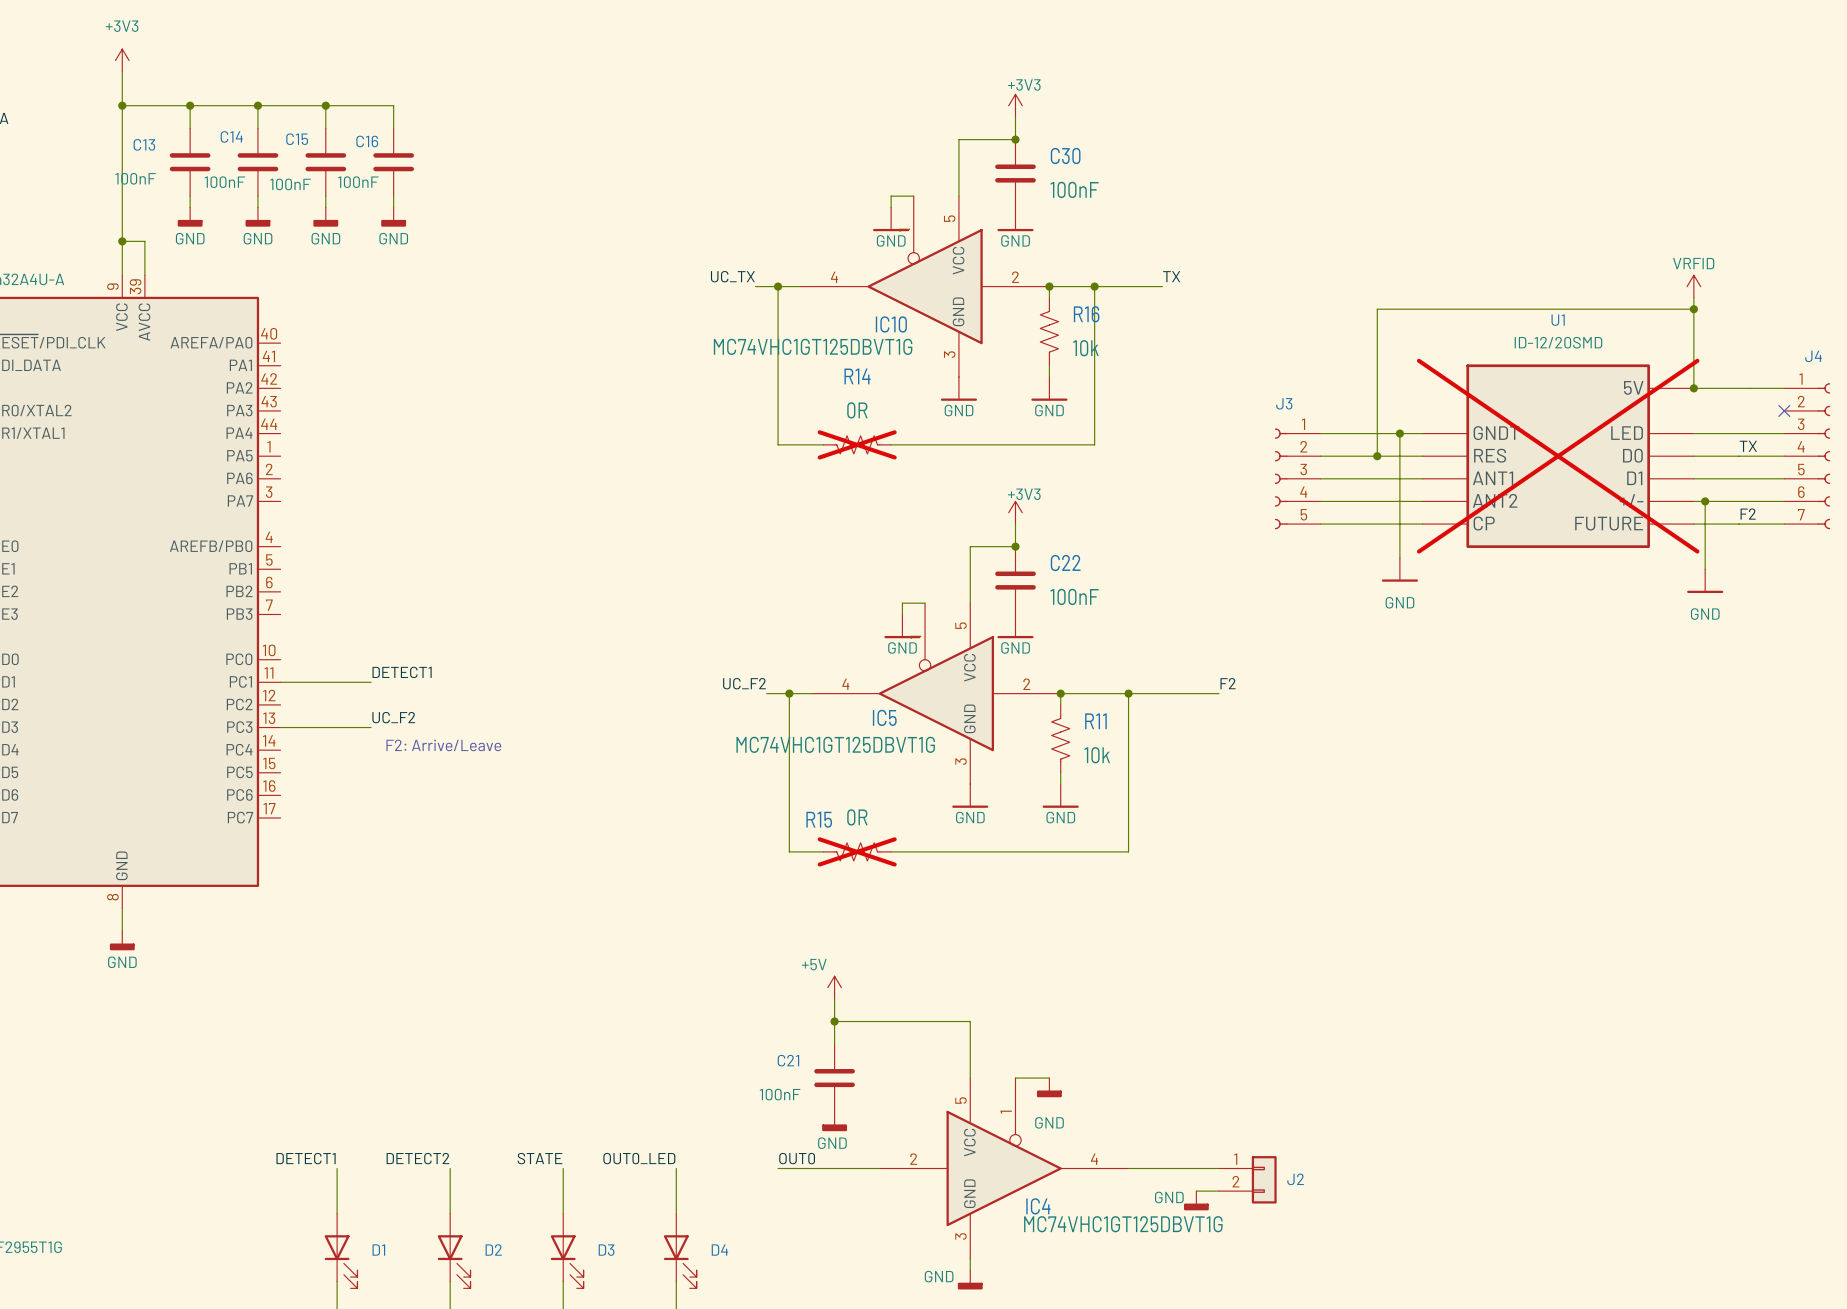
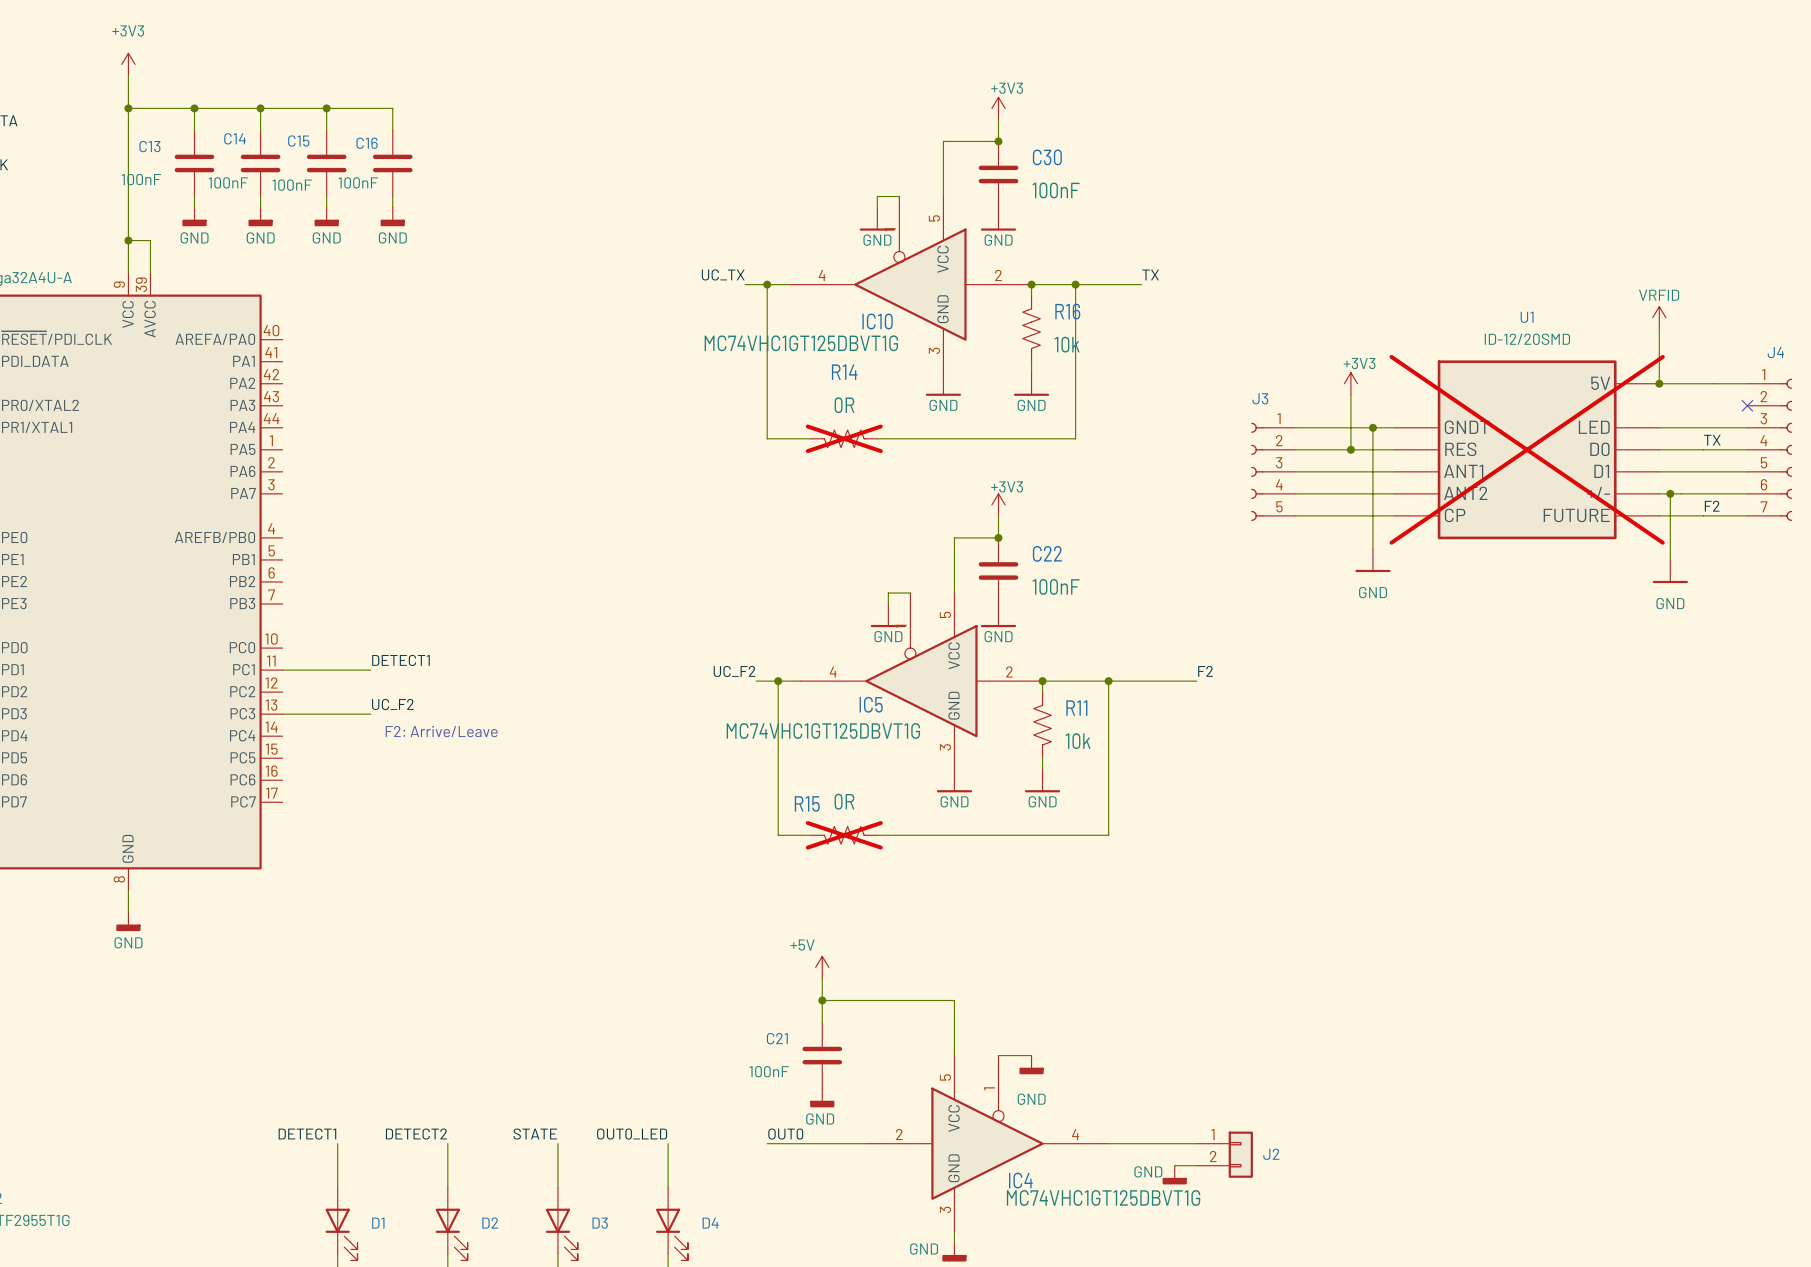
power symbol position: VRFID (1693, 286) -> VRFID (1659, 317)
wire: (1693, 309) (1377, 309) (1377, 399) -> none
junction: (1693, 309) -> none
power symbol: none -> +3V3 (1350, 383)

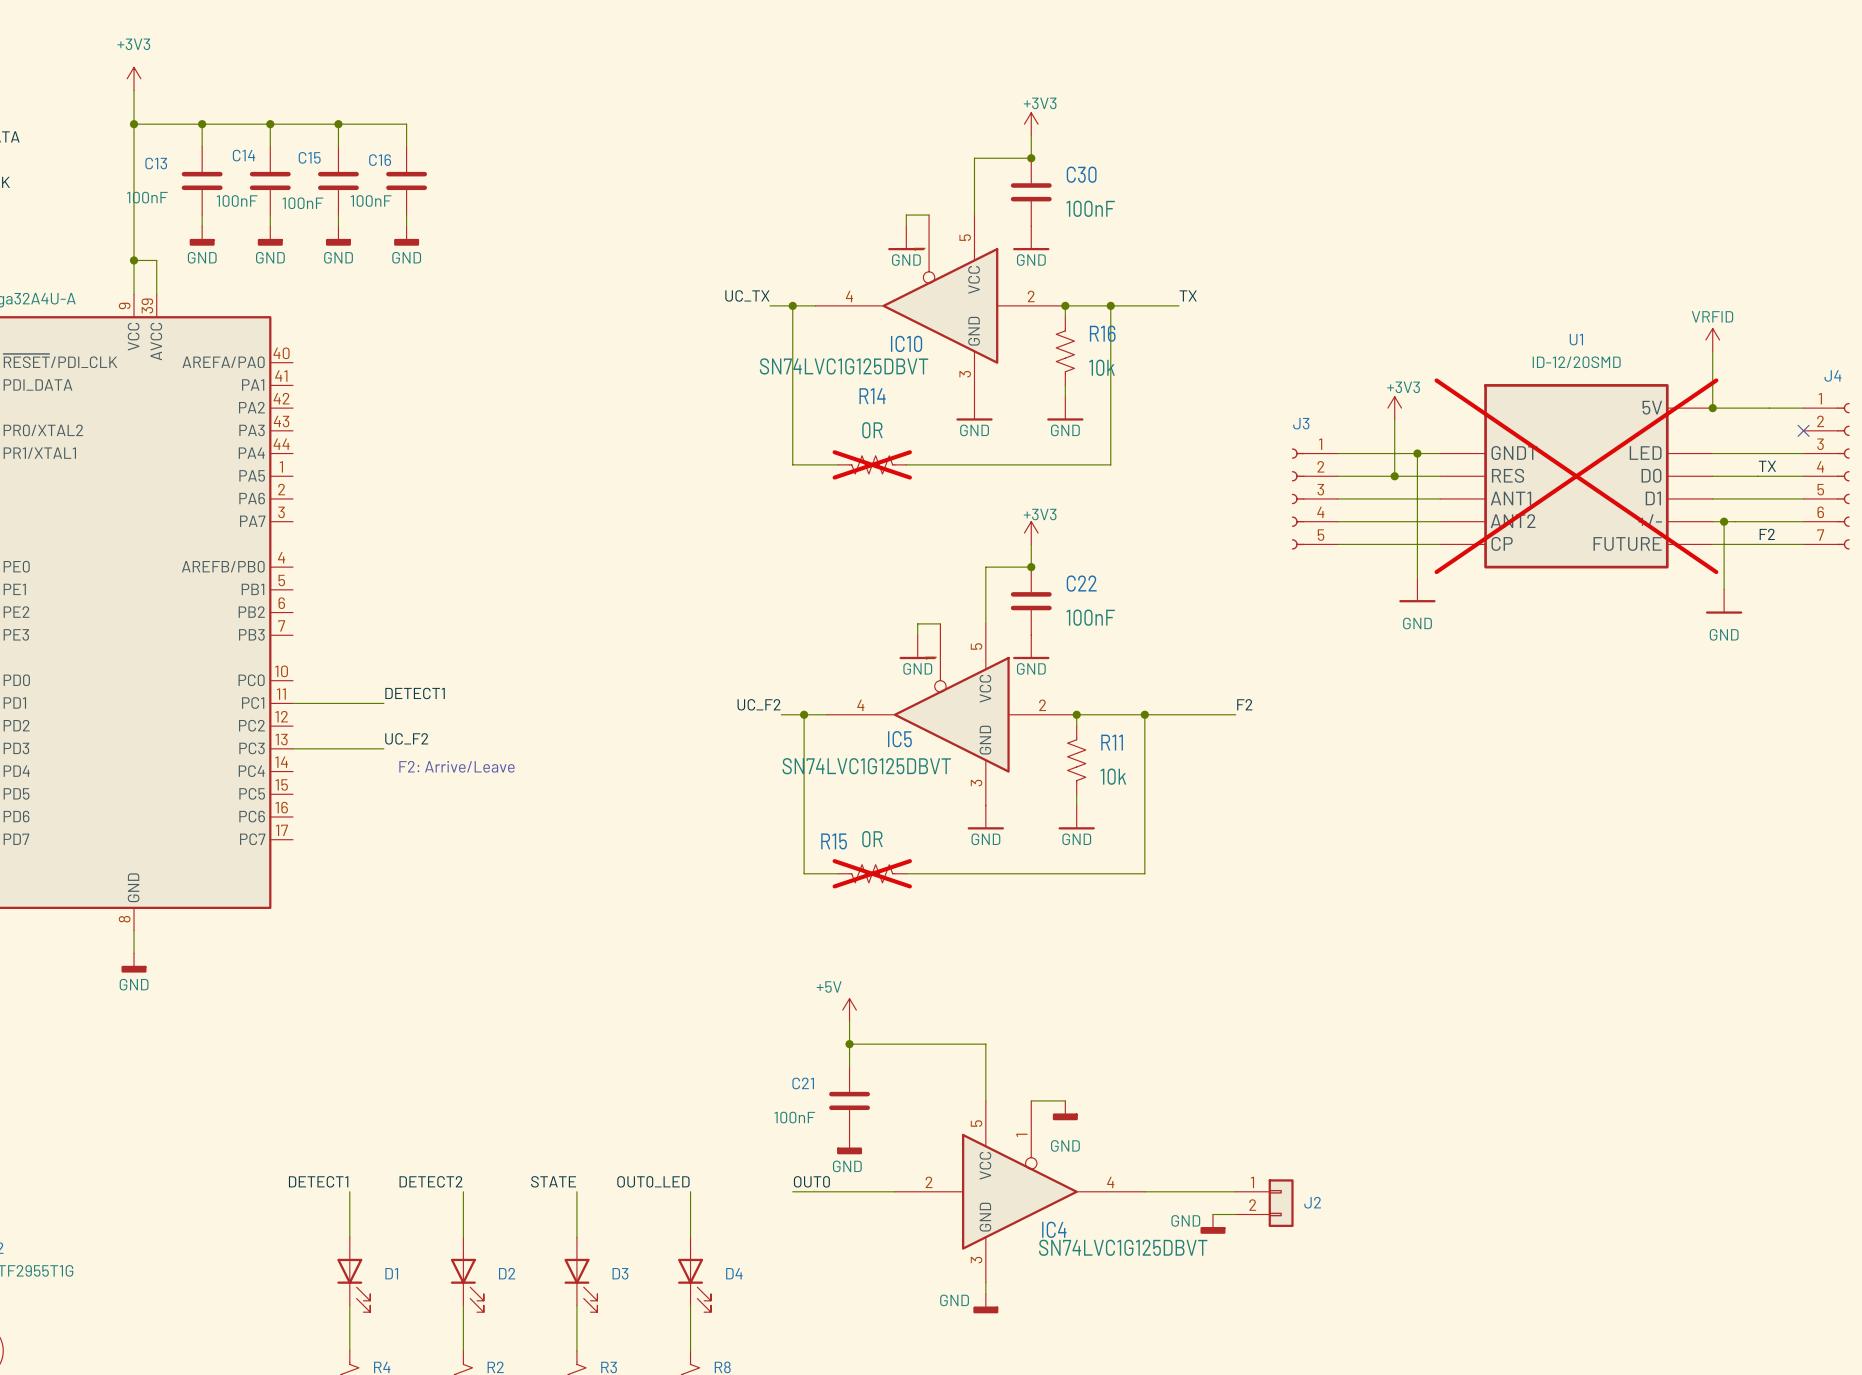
IC10 value: MC74VHC1GT125DBVT1G (801, 343) -> SN74LVC1G125DBVT (844, 366)
IC5 value: MC74VHC1GT125DBVT1G (823, 731) -> SN74LVC1G125DBVT (866, 766)
IC4 value: MC74VHC1GT125DBVT1G (1103, 1197) -> SN74LVC1G125DBVT (1123, 1247)

